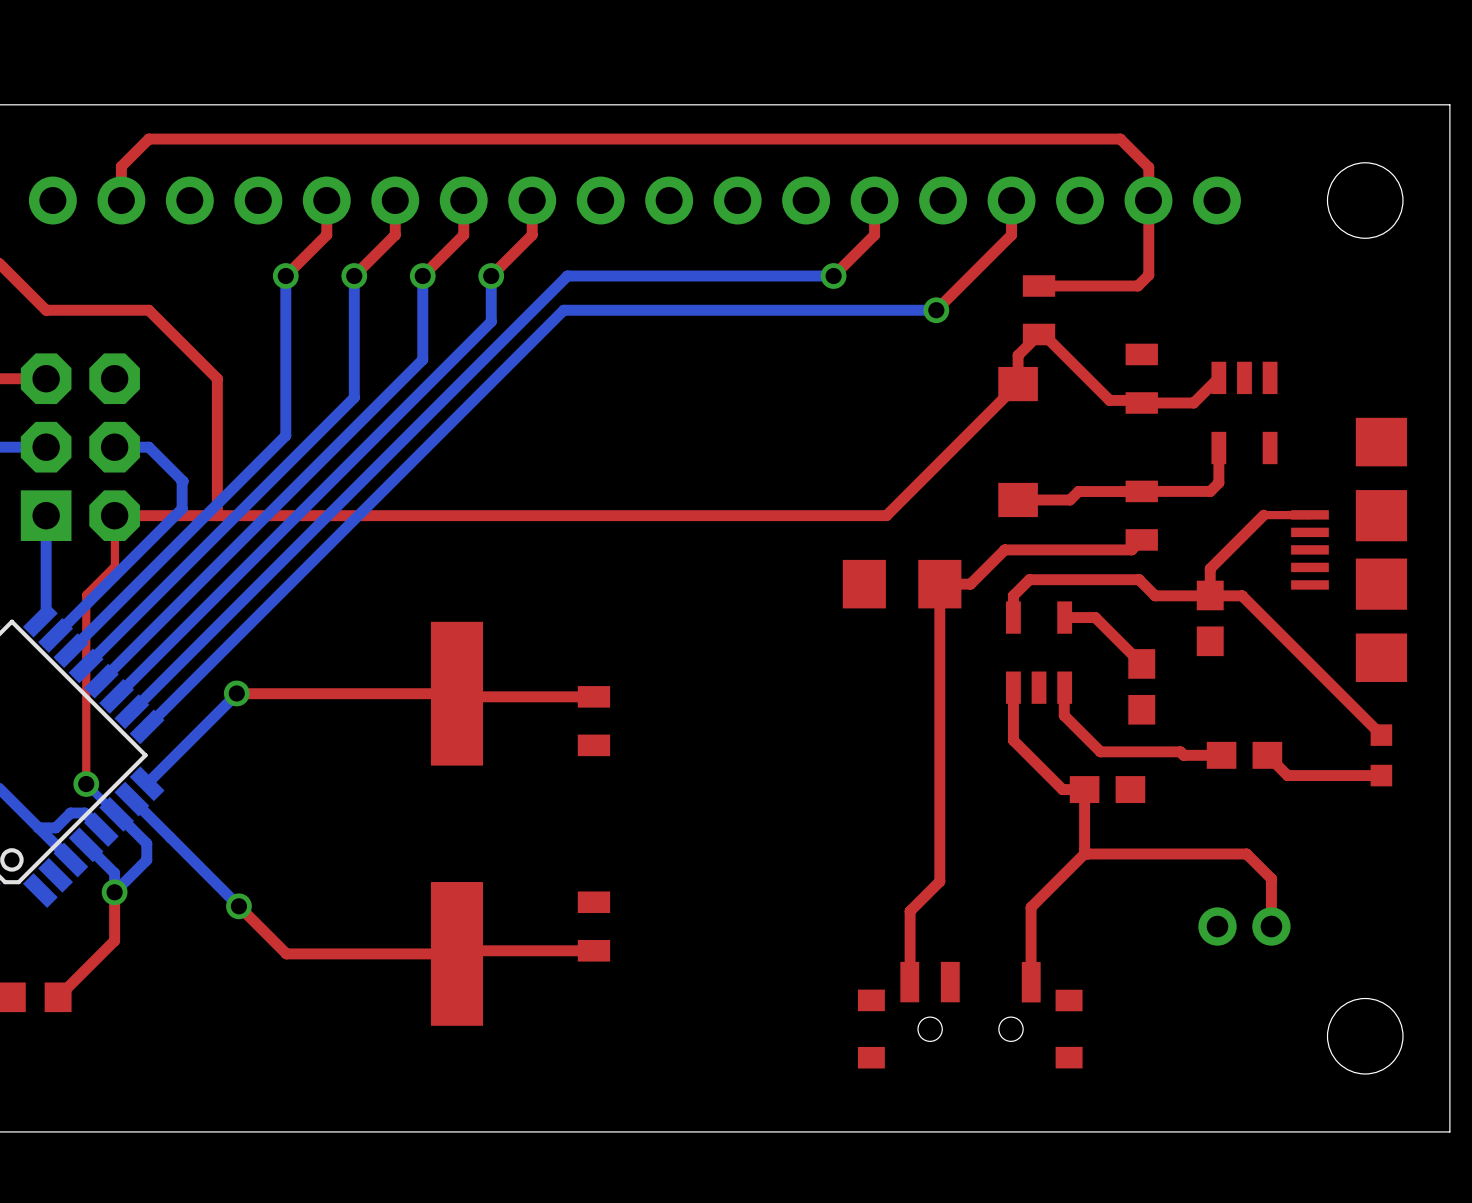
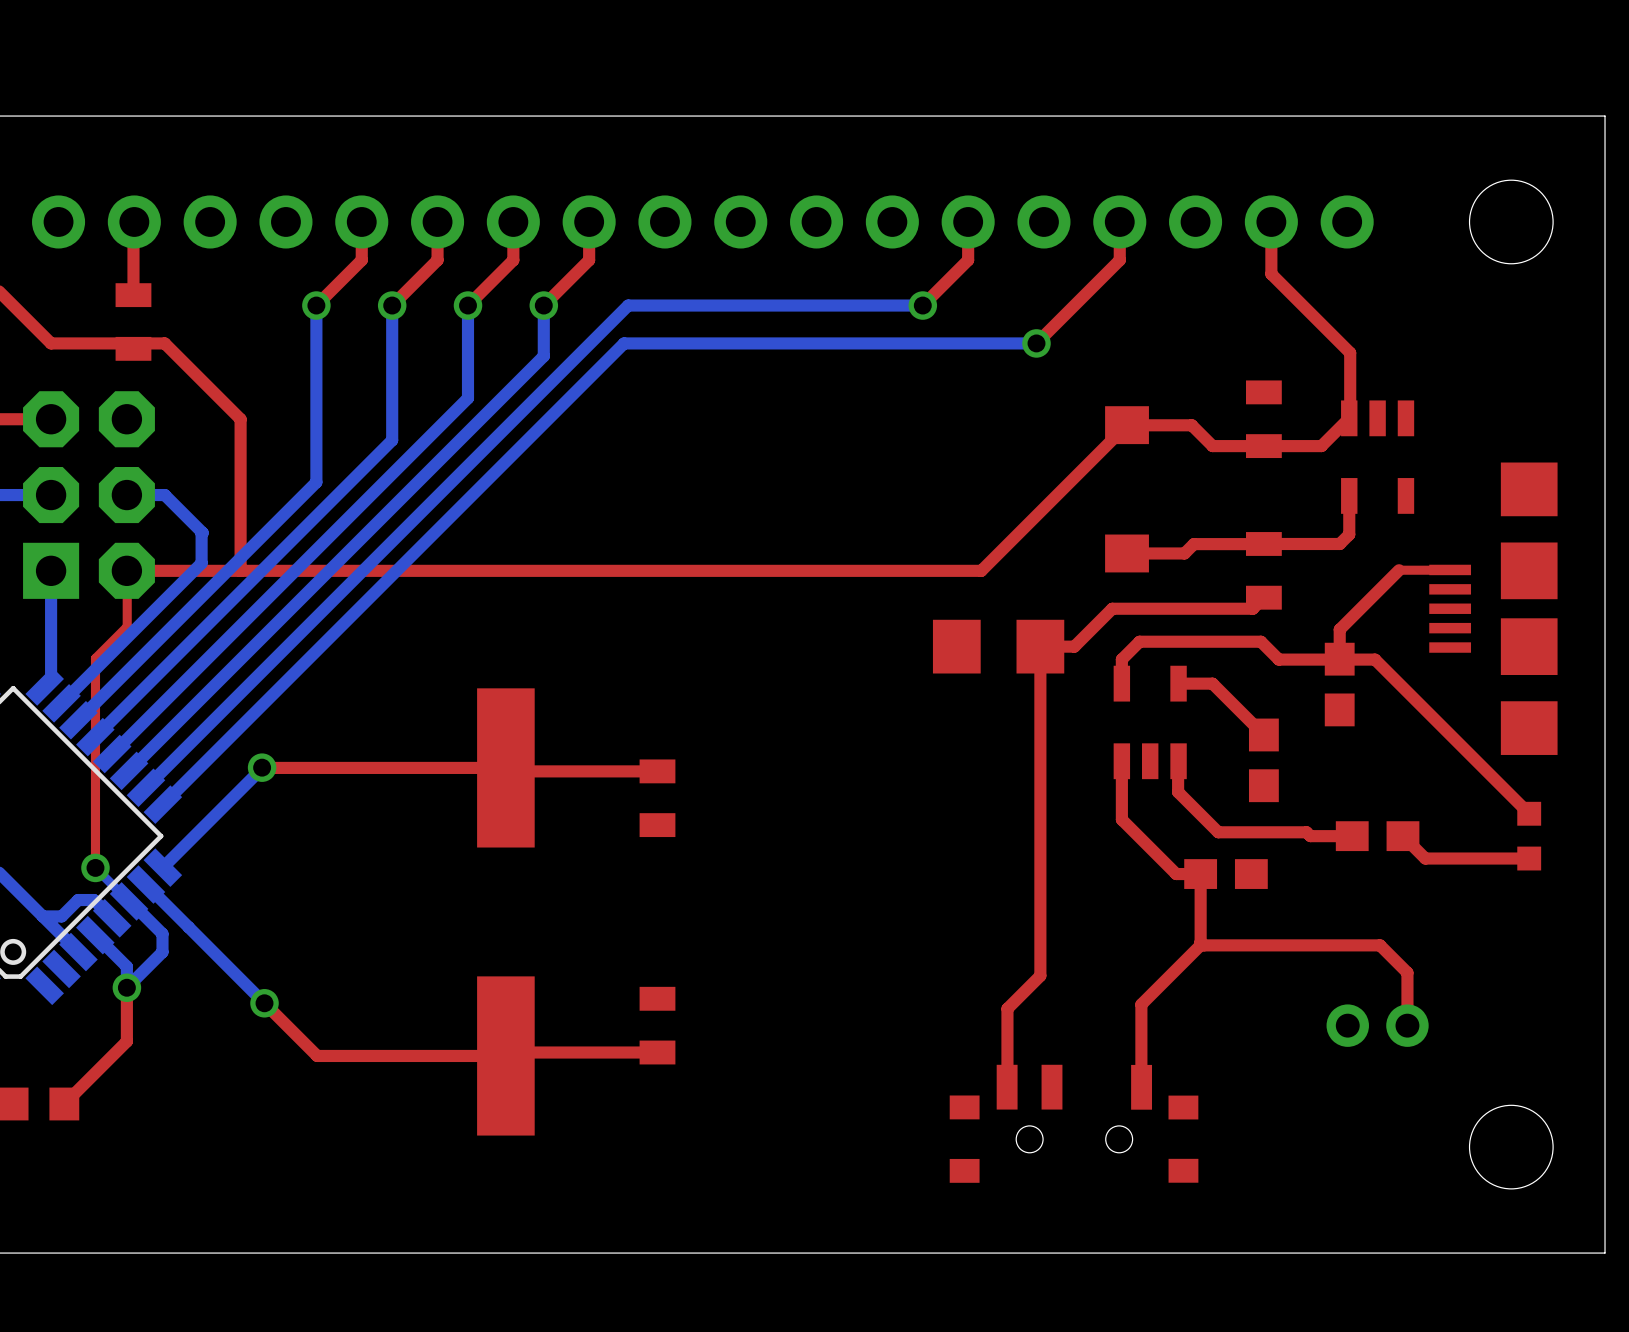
top track: (1148, 200) (1148, 275) (1137, 285) (1039, 285) -> (1271, 221) (1271, 274) (1350, 352) (1349, 418)
top track: (1148, 200) (1148, 167) (1120, 139) (148, 139) (121, 166) (121, 200) -> (133, 295) (134, 221)
part: none -> (133, 321)
part: (1039, 310) -> none
top track: (1018, 384) (1018, 355) (1039, 334) (1043, 334) (1109, 400) (1139, 400) (1141, 402) -> (1127, 425) (1191, 425) (1212, 446) (1263, 446)

